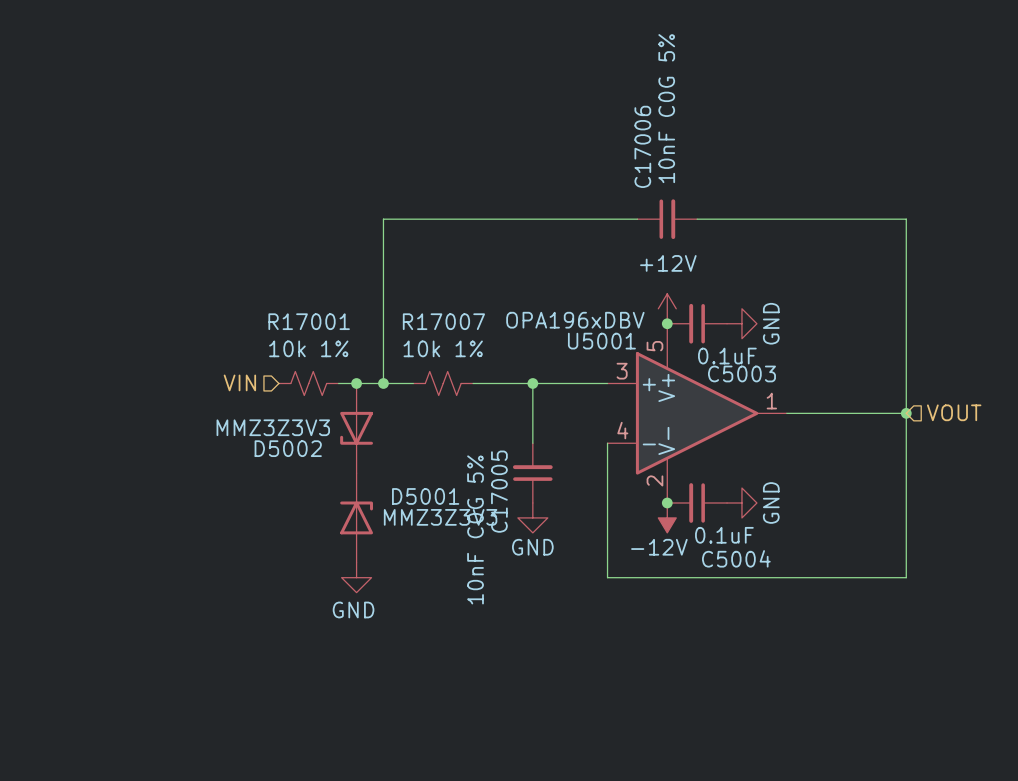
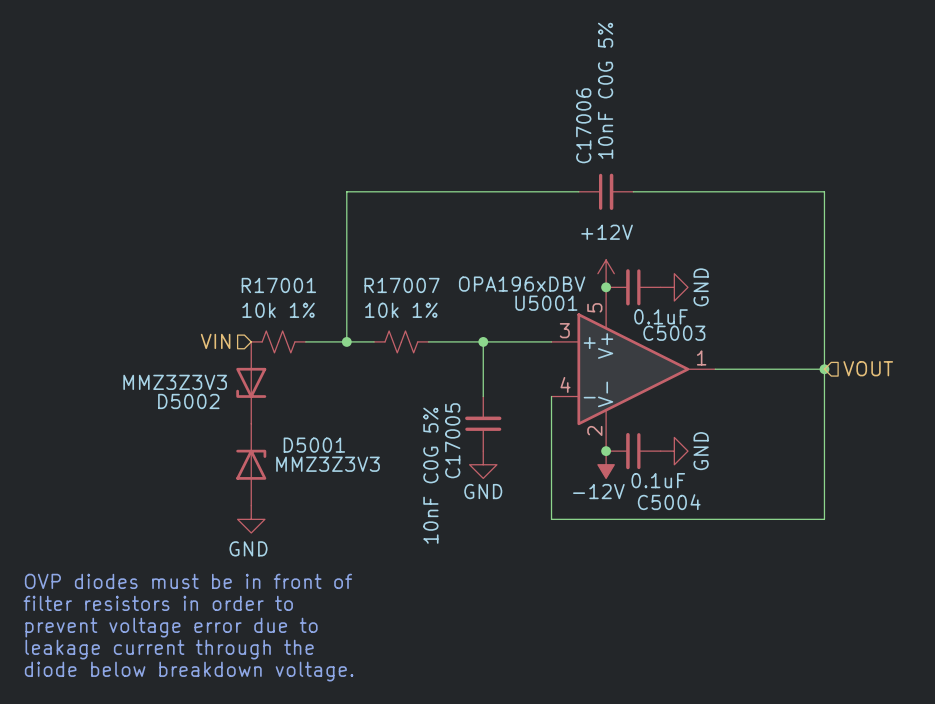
junction: (356, 383) -> none
D5002 position: (356, 428) -> (251, 382)
D5001 position: (356, 517) -> (251, 464)
power symbol position: GND (356, 577) -> GND (251, 519)
text: none -> OVP diodes must be in front of (188, 581)
text: none -> filter resistors in order to (158, 603)
text: none -> prevent voltage error due to (171, 627)
text: none -> leakage current through the (169, 649)
text: none -> diode below breakdown voltage. (189, 671)

